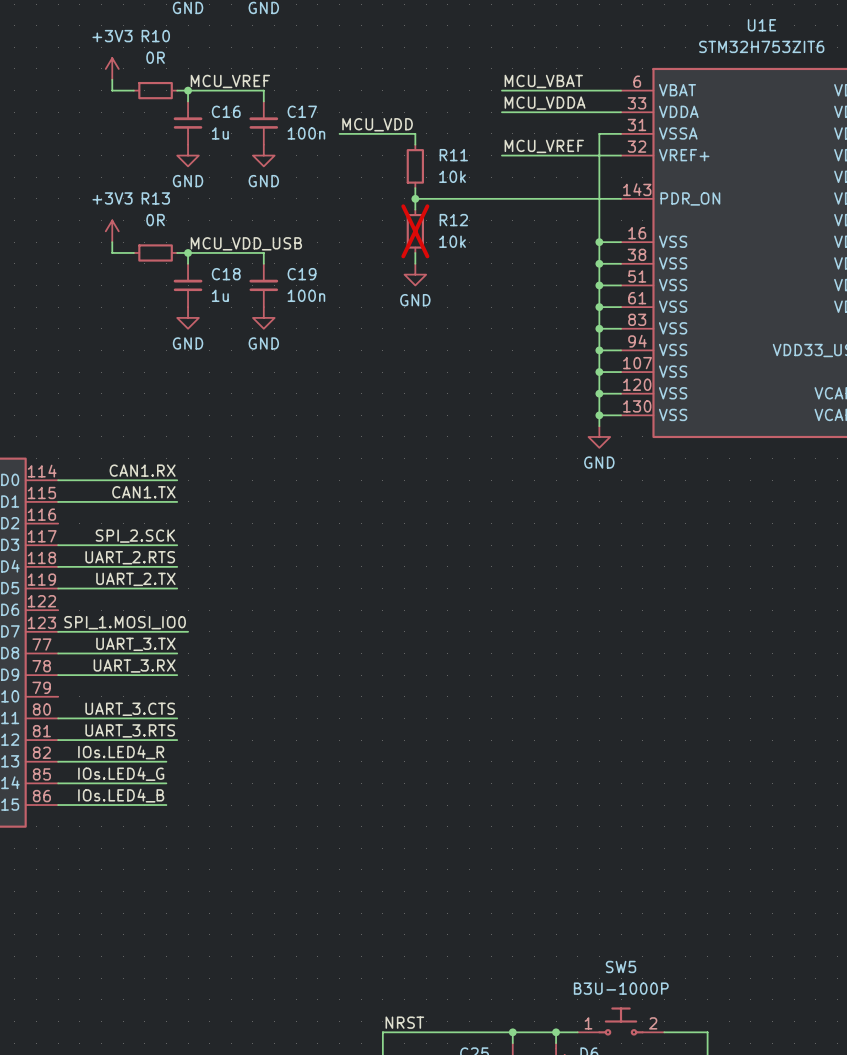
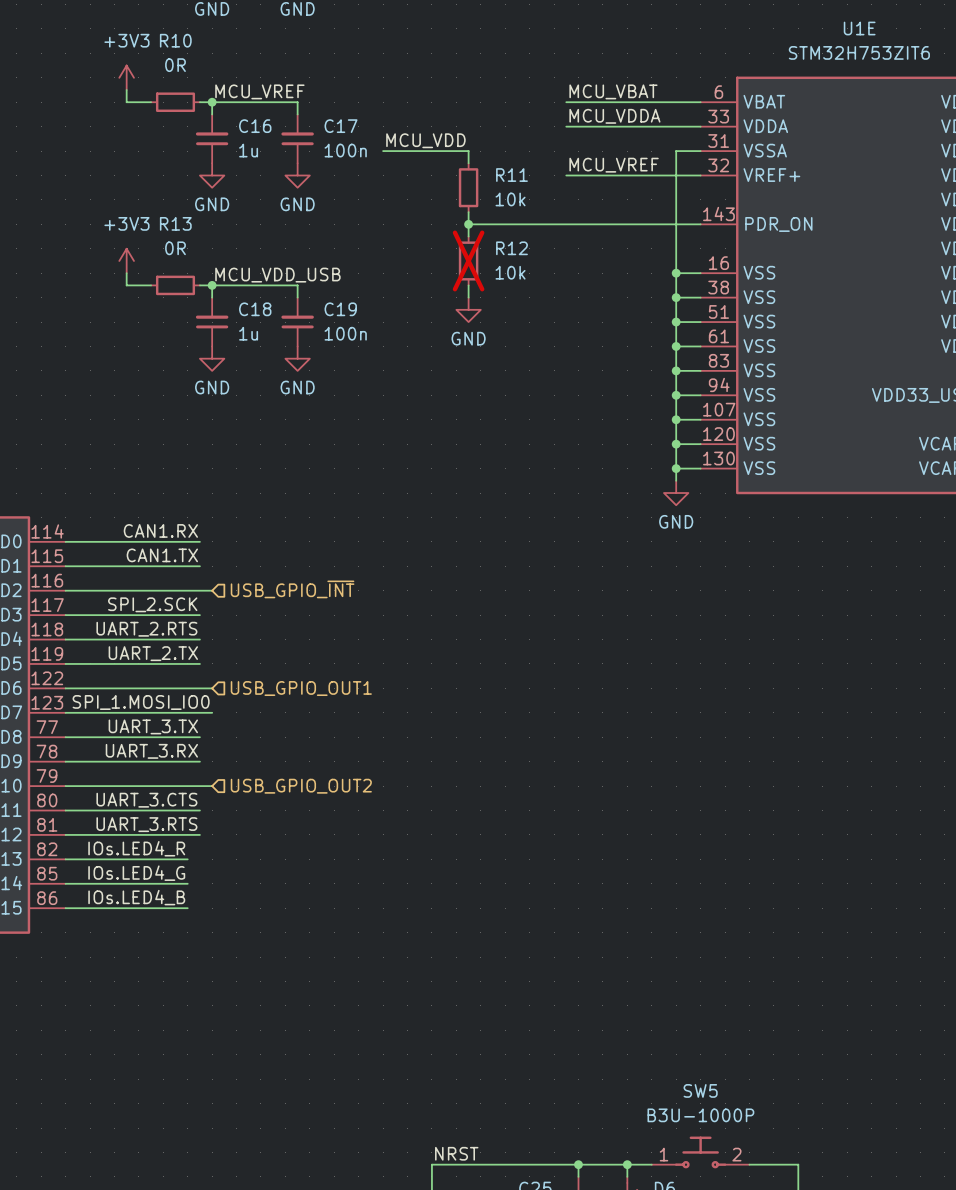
hierarchical label: none -> USB_GPIO_~{INT} (292, 589)
wire: none -> (65, 590) (212, 590)
wire: none -> (65, 688) (212, 688)
hierarchical label: none -> USB_GPIO_OUT1 (301, 688)
wire: none -> (65, 786) (212, 786)
hierarchical label: none -> USB_GPIO_OUT2 (301, 786)

